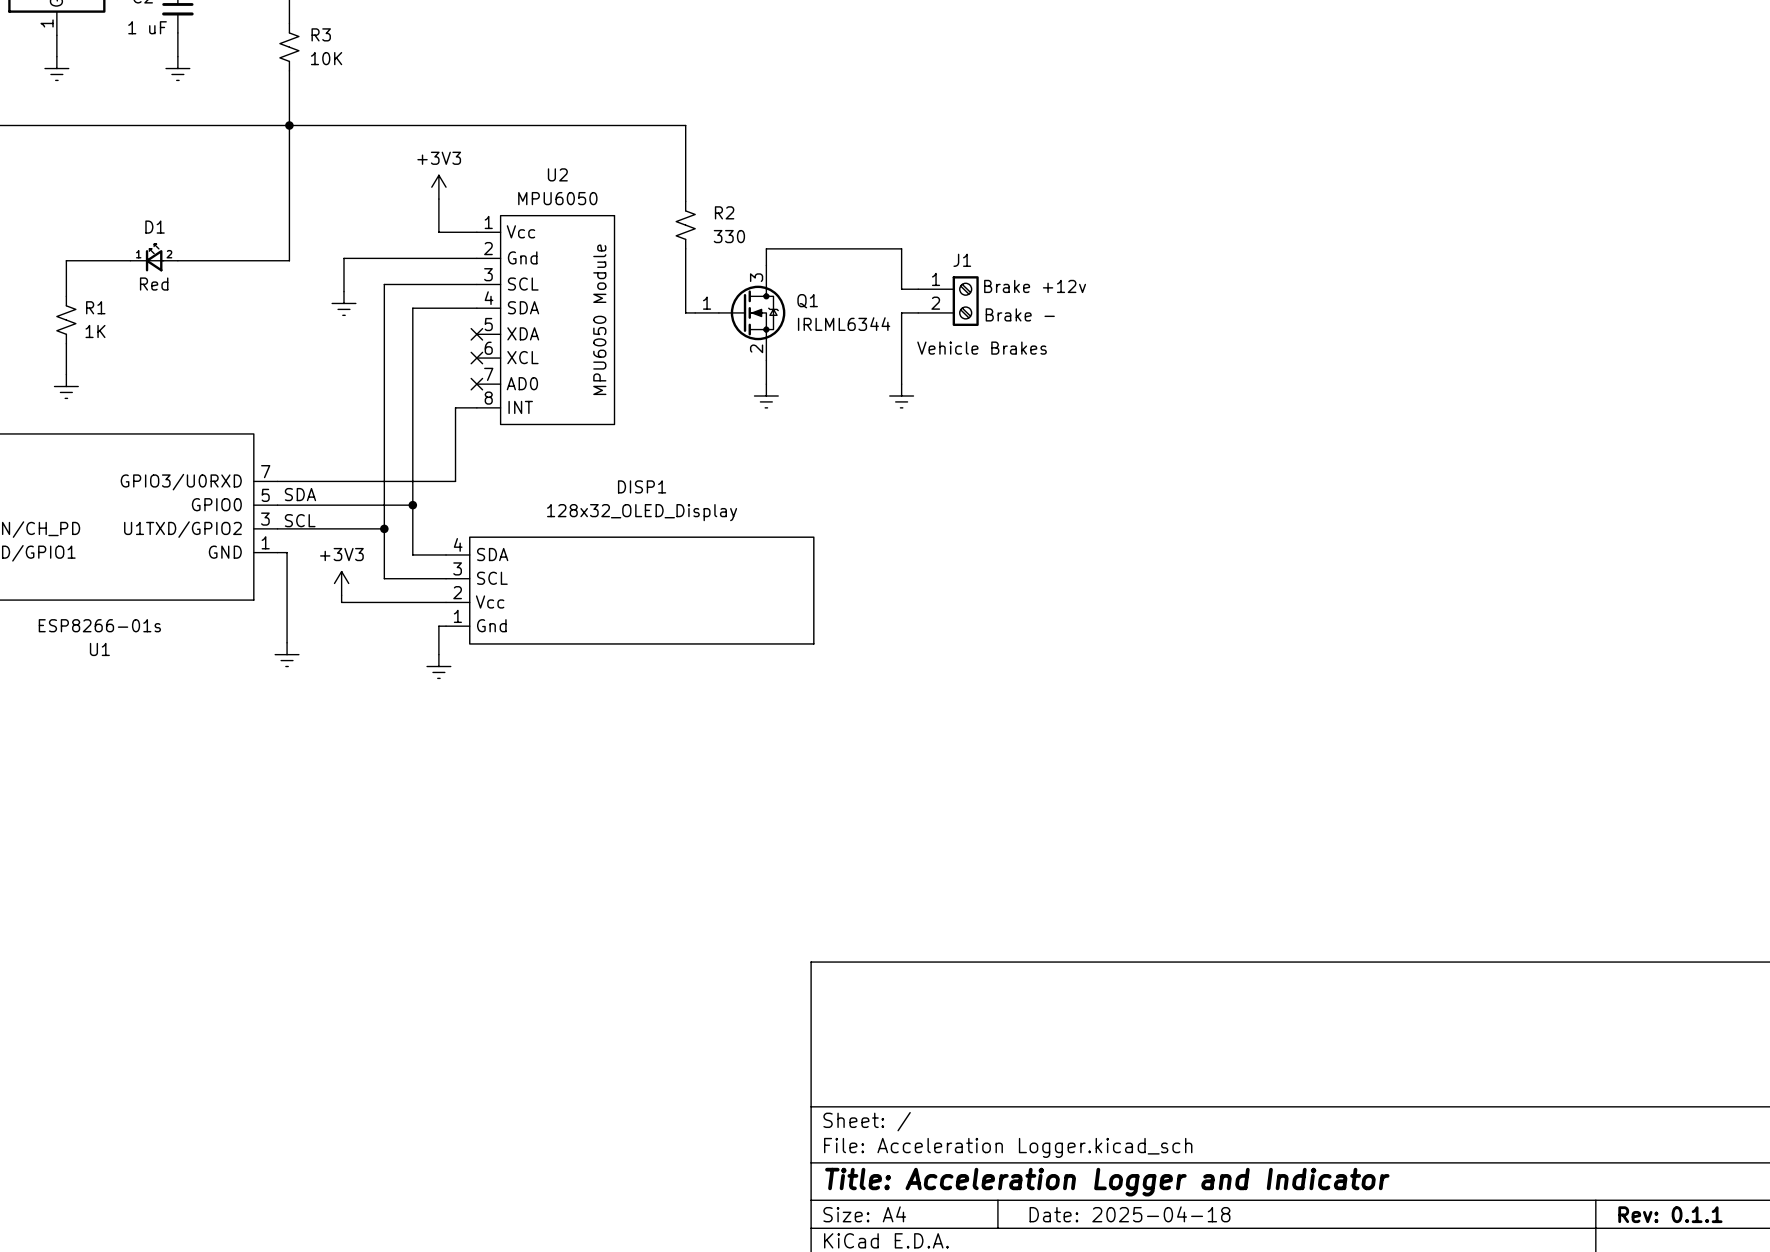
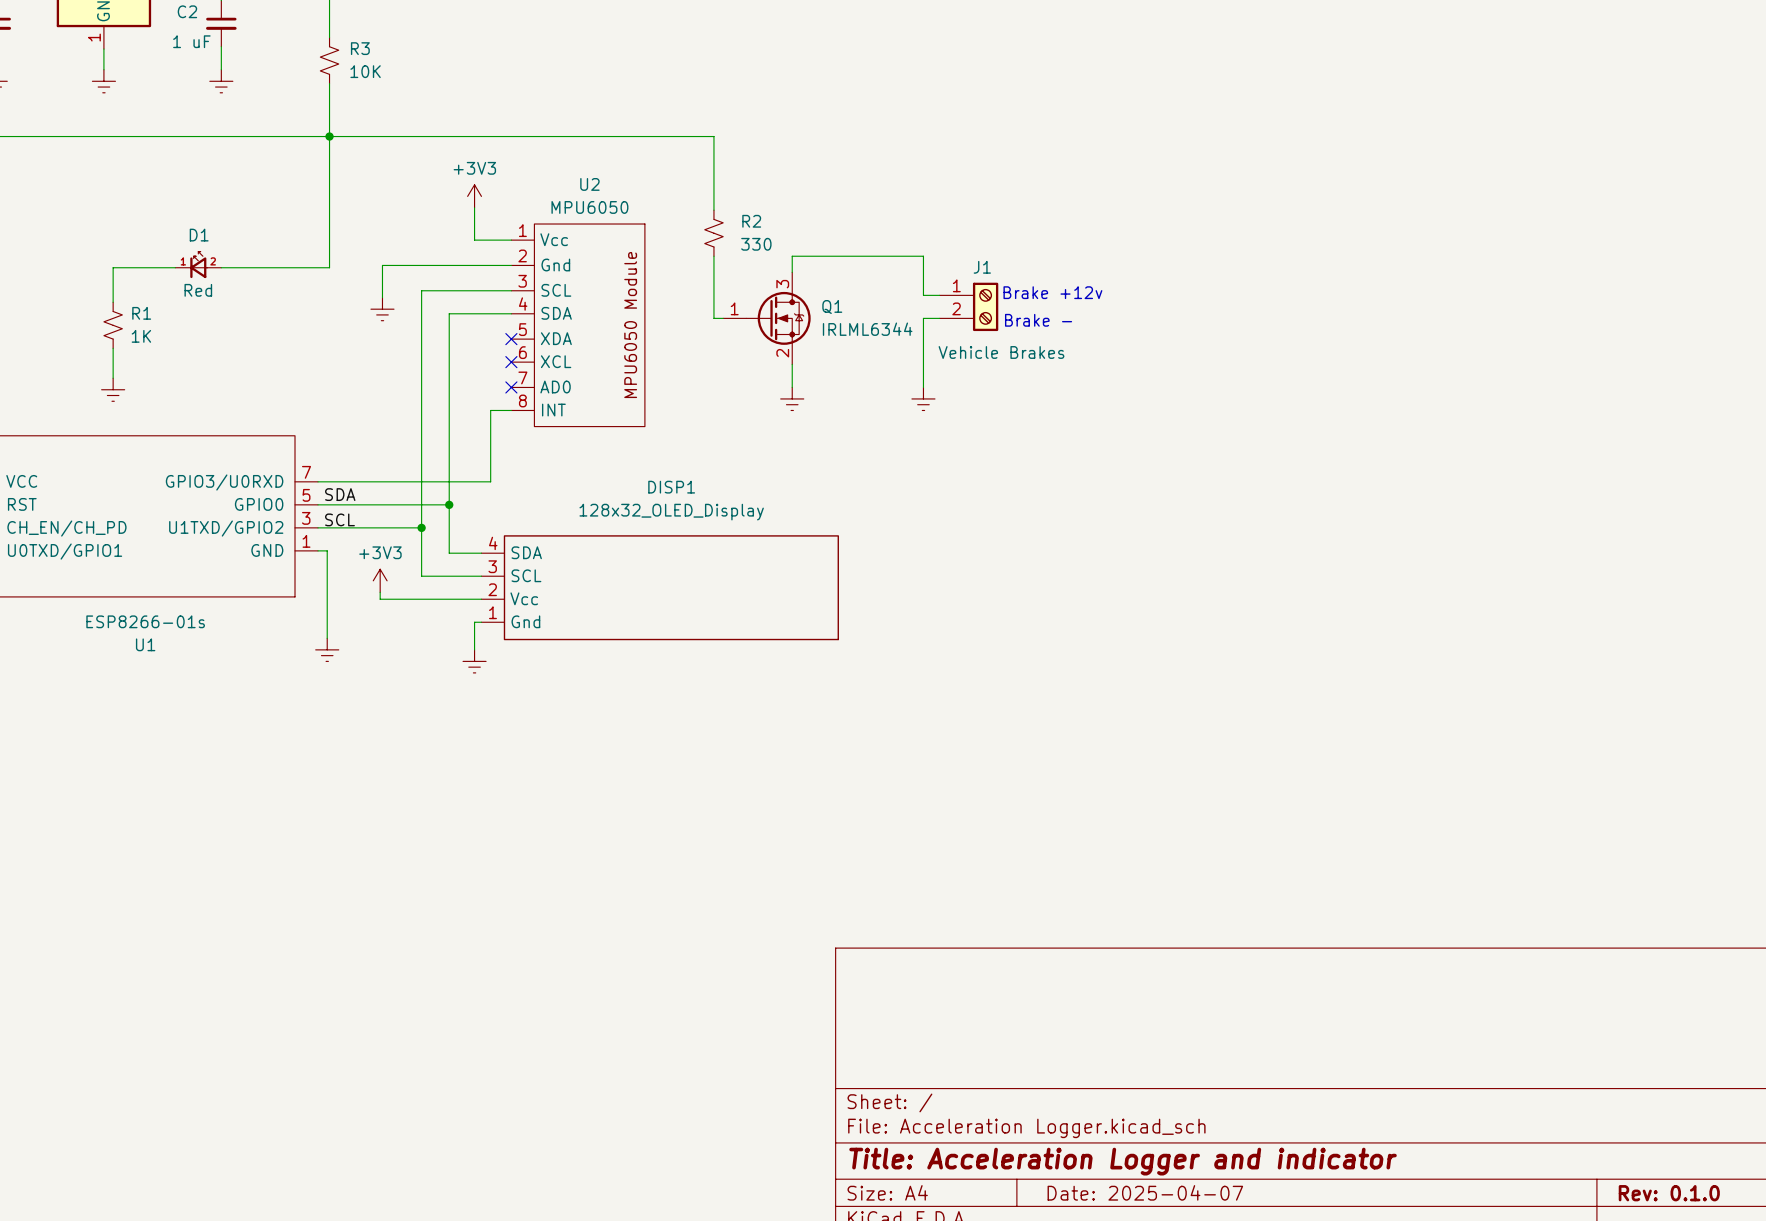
title block: Title: Acceleration Logger and Indicator (1107, 1182) -> Title: Acceleration Logger and indicator (1123, 1161)
title block: Date: 2025-04-18 (1130, 1214) -> Date: 2025-04-07 (1145, 1192)
title block: Rev: 0.1.1 (1670, 1214) -> Rev: 0.1.0 (1669, 1193)

